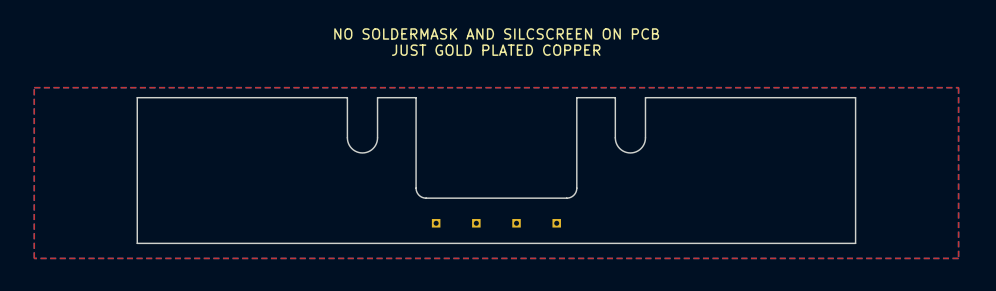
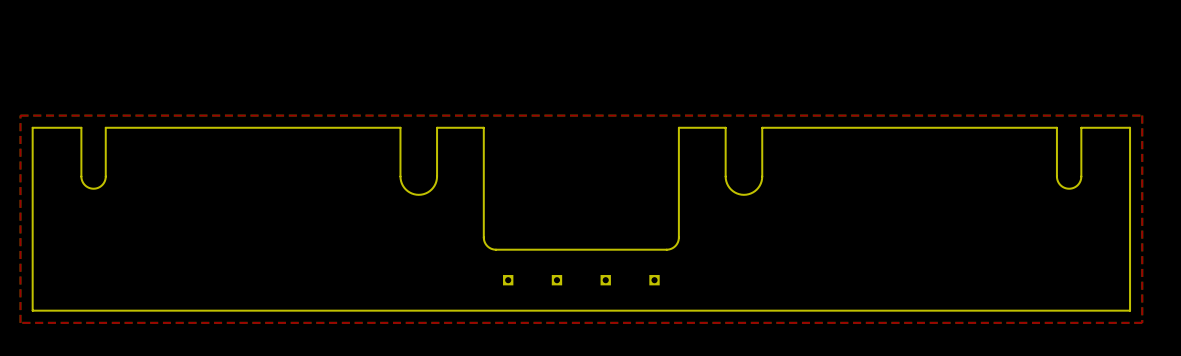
text: NO SOLDERMASK AND SILCSCREEN ON PCB (496, 33) -> none
text: JUST GOLD PLATED COPPER (496, 50) -> none
board edge: (137, 97) (137, 243) (855, 243) (855, 97) -> (145, 127) (105, 127) (105, 179) (100, 186) (93, 188) (86, 186) (81, 179) (81, 127) (32, 127) (32, 310) (1130, 310) (1130, 127) (1081, 127) (1080, 179) (1076, 186) (1069, 188) (1061, 186) (1057, 179) (1056, 127) (1017, 127)

